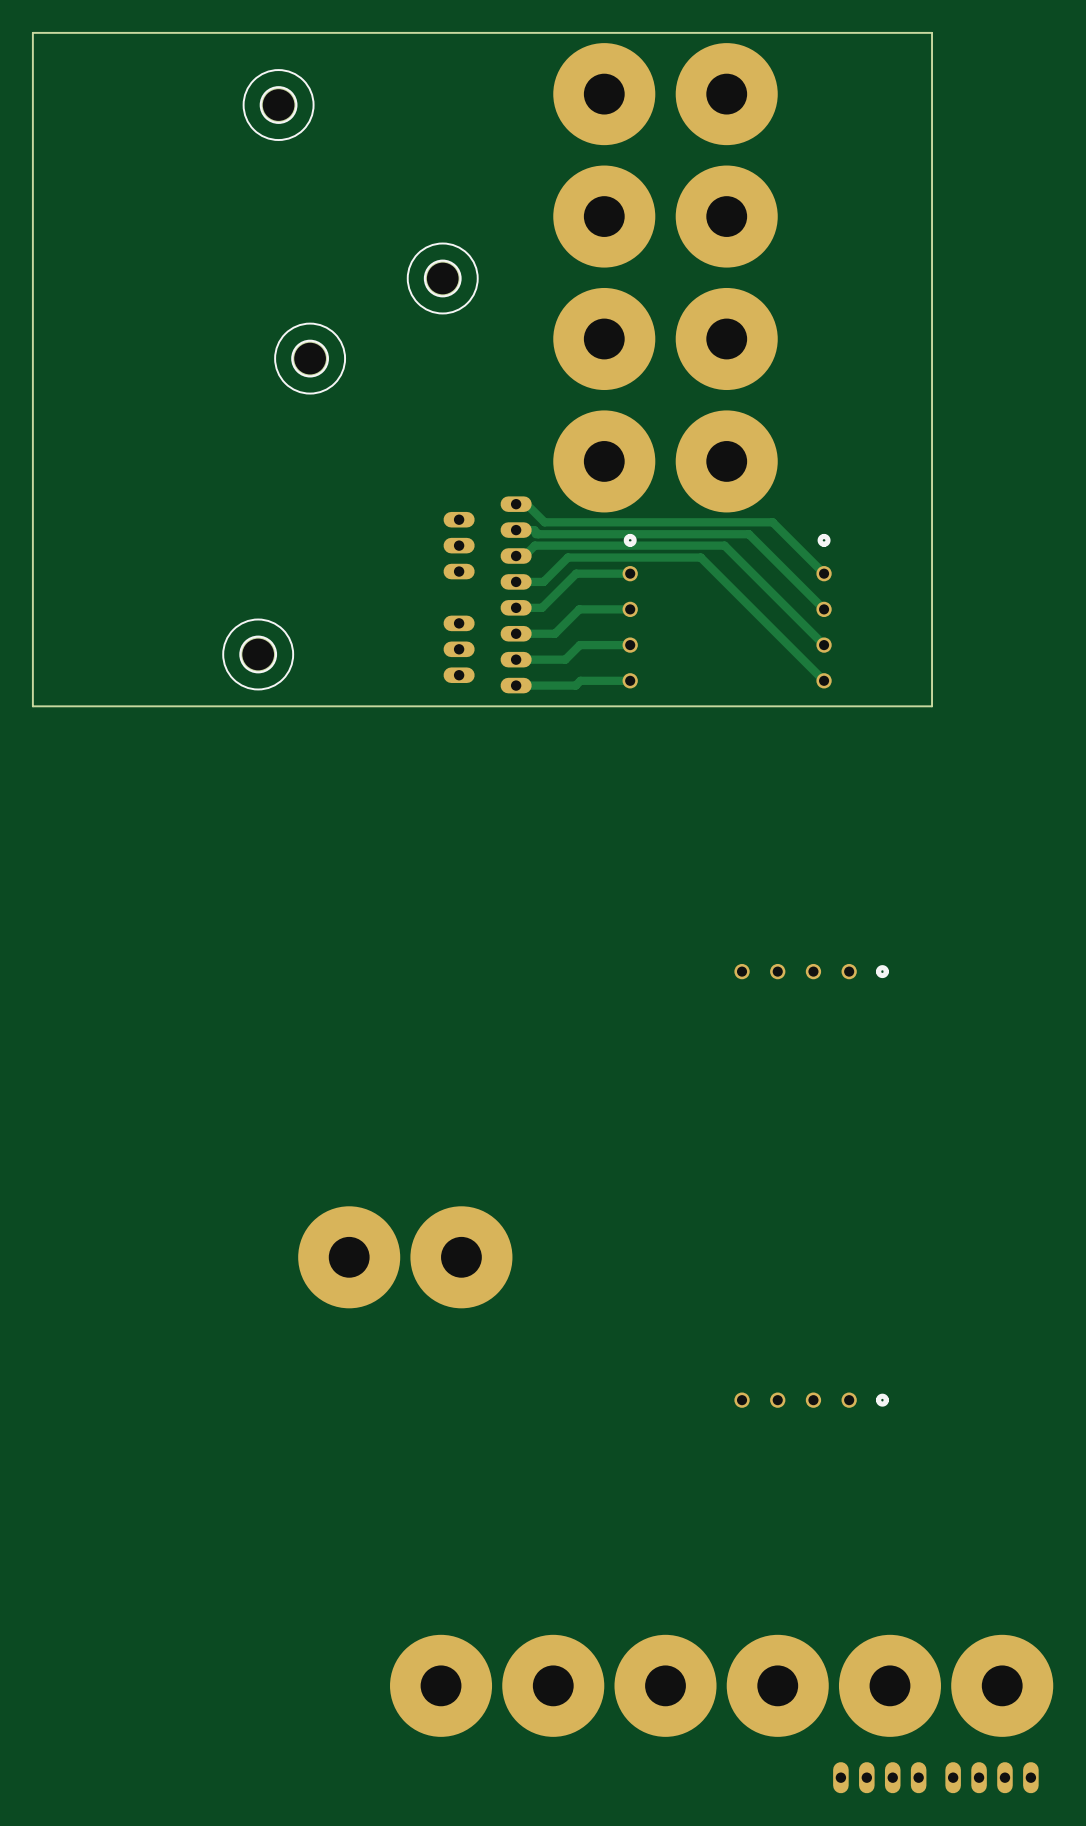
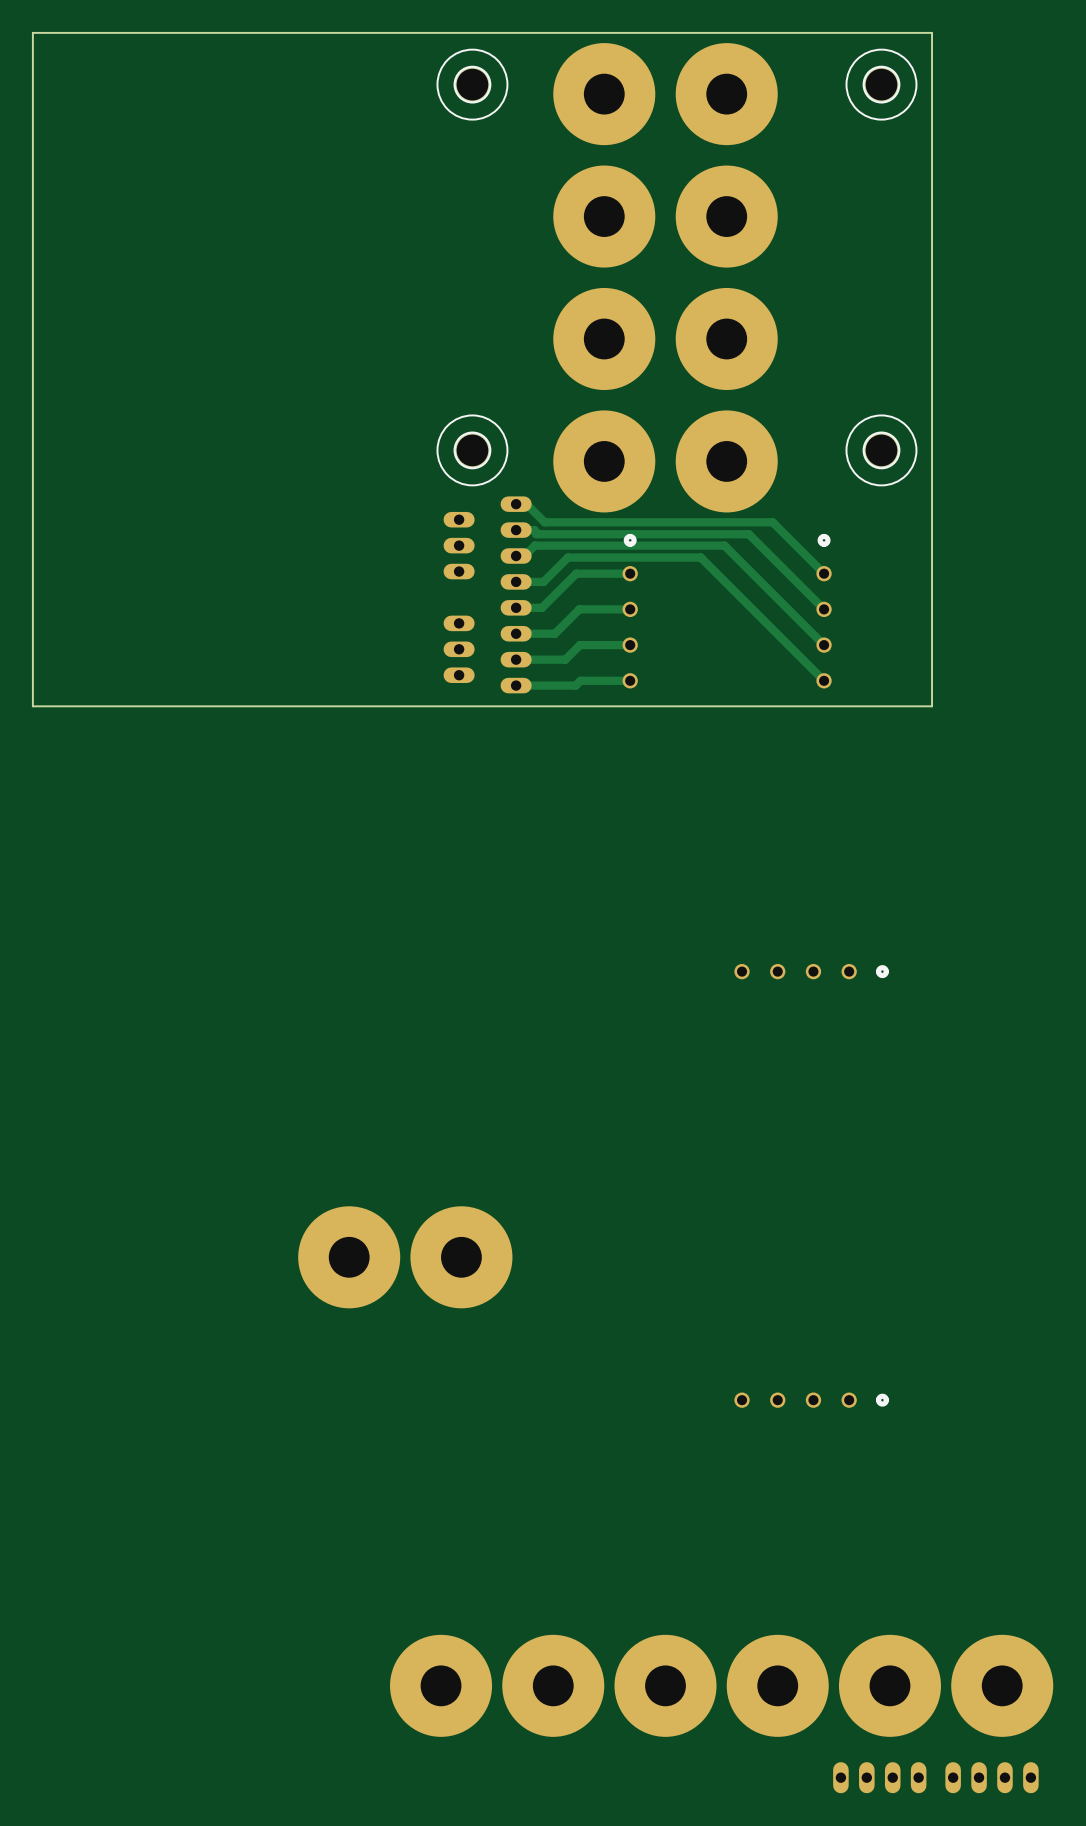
part: none -> (472, 84)
part: none -> (881, 84)
part: (278, 105) -> none
part: (442, 278) -> none
part: (310, 358) -> none
part: none -> (472, 450)
part: none -> (881, 450)
part: (258, 654) -> none

